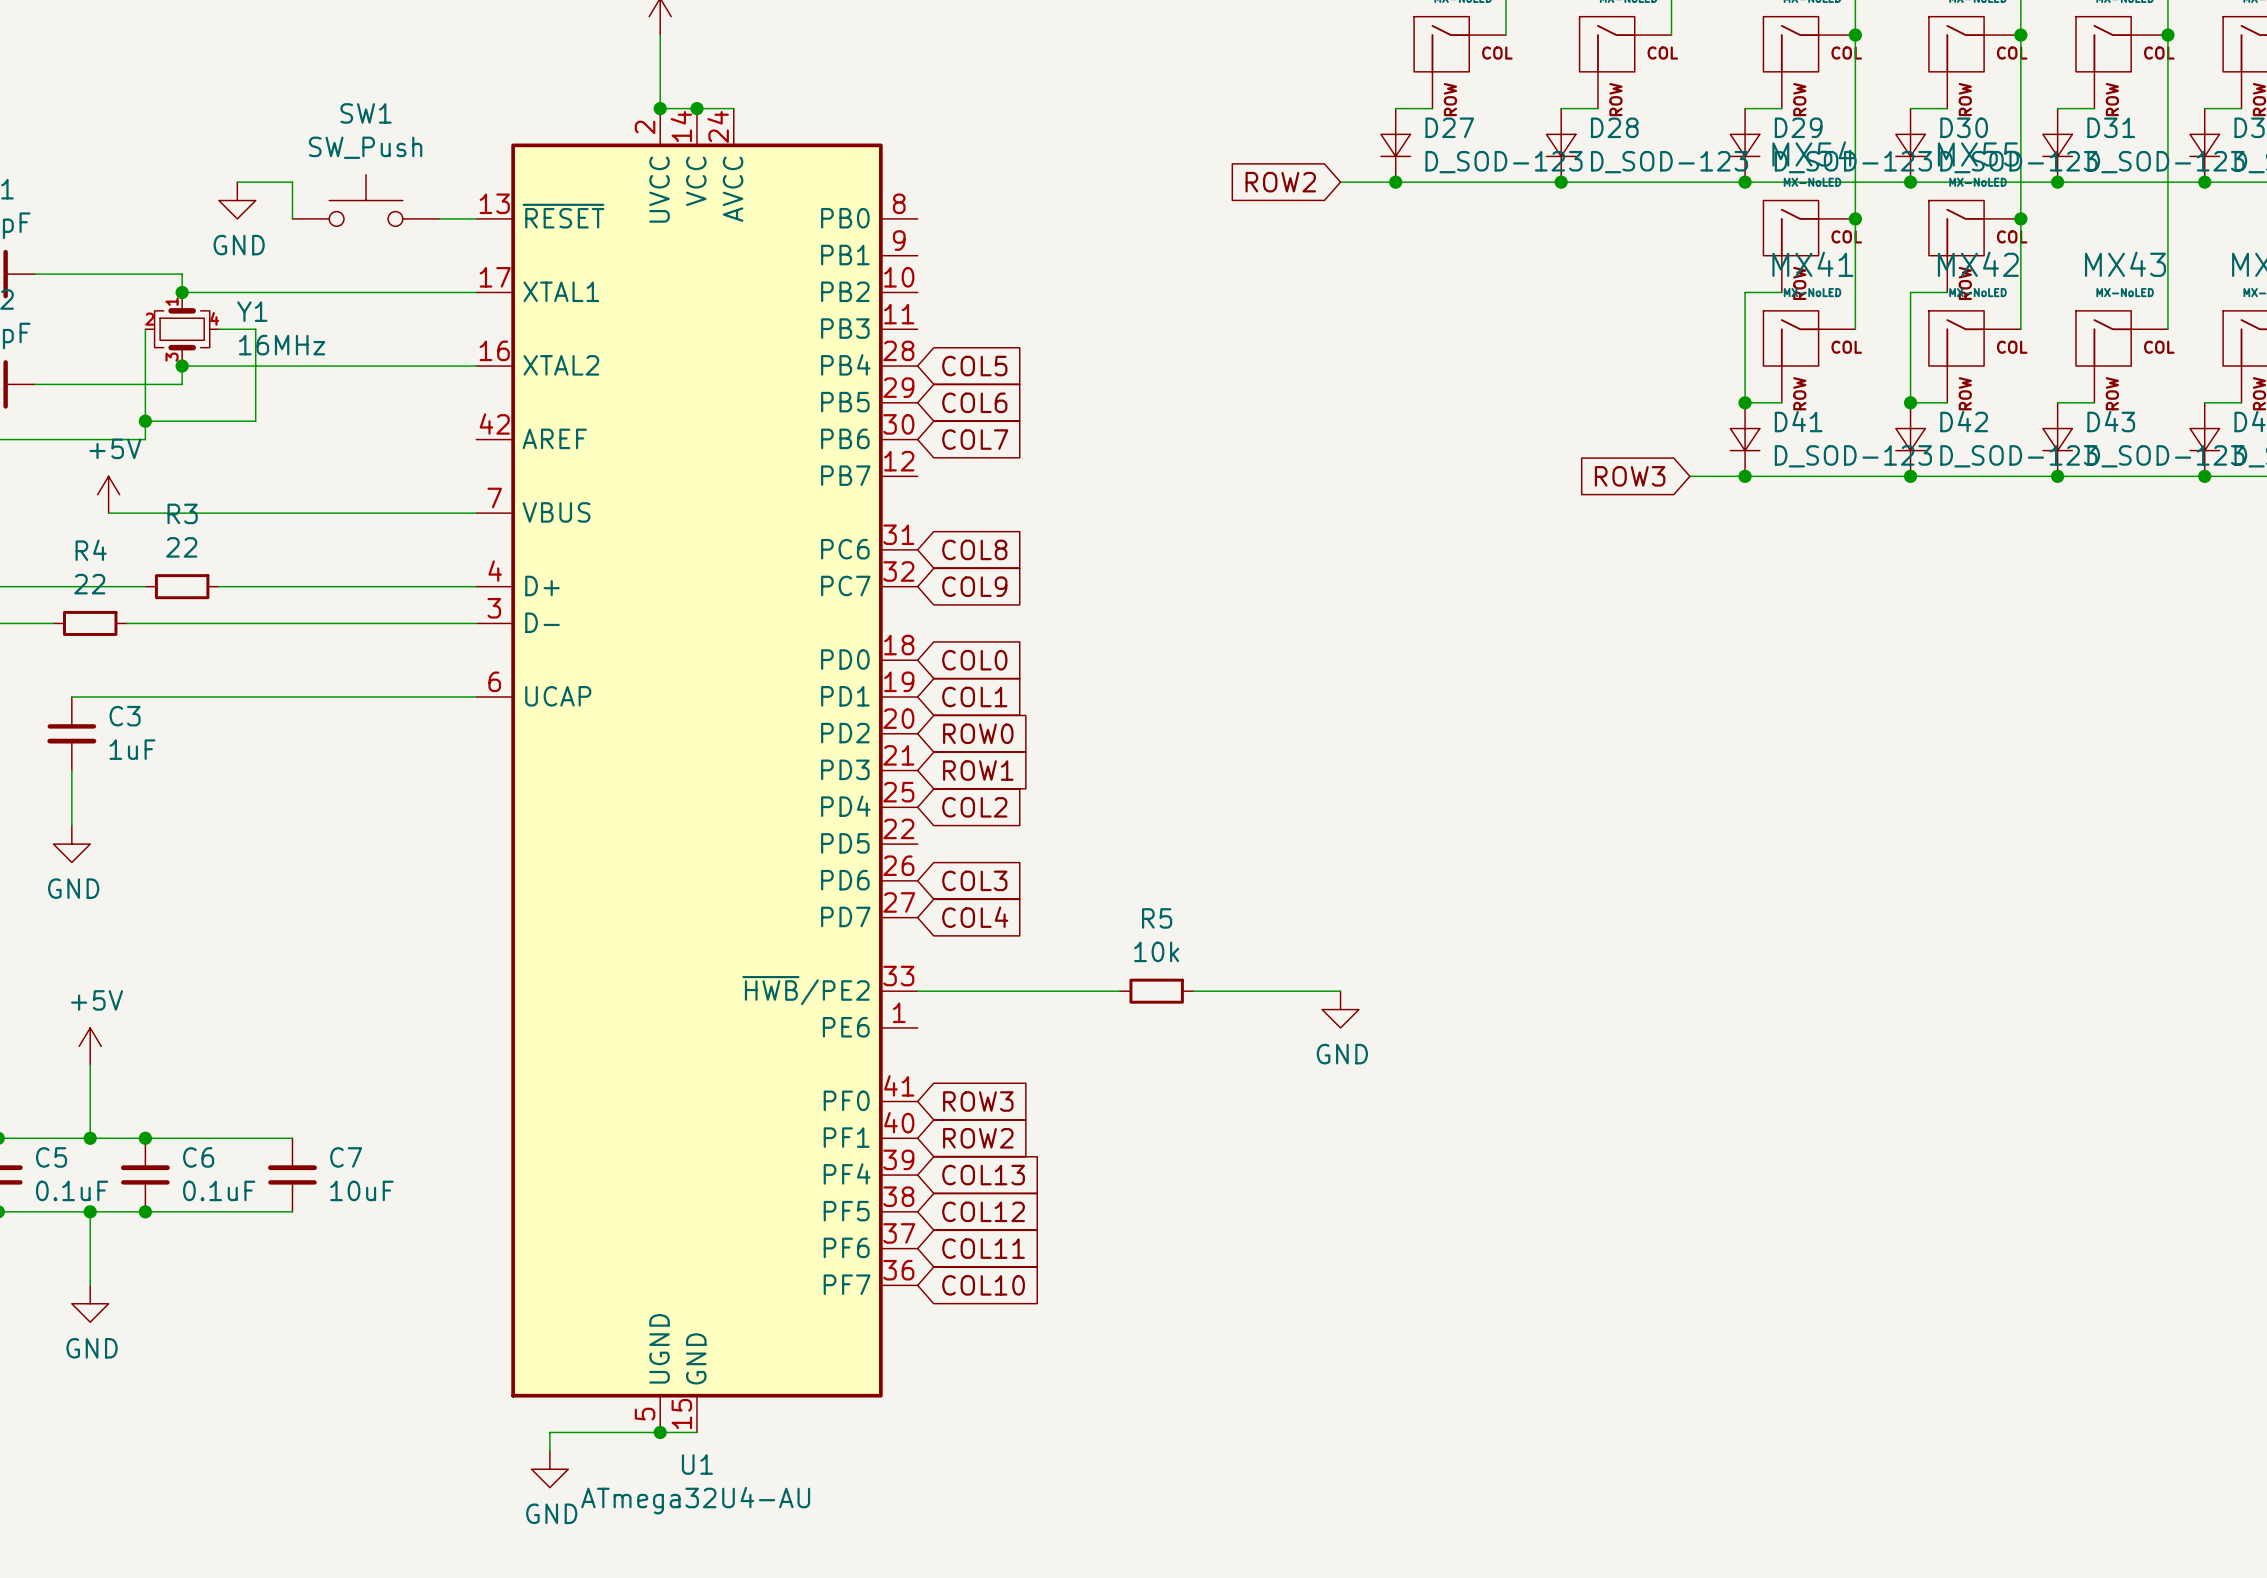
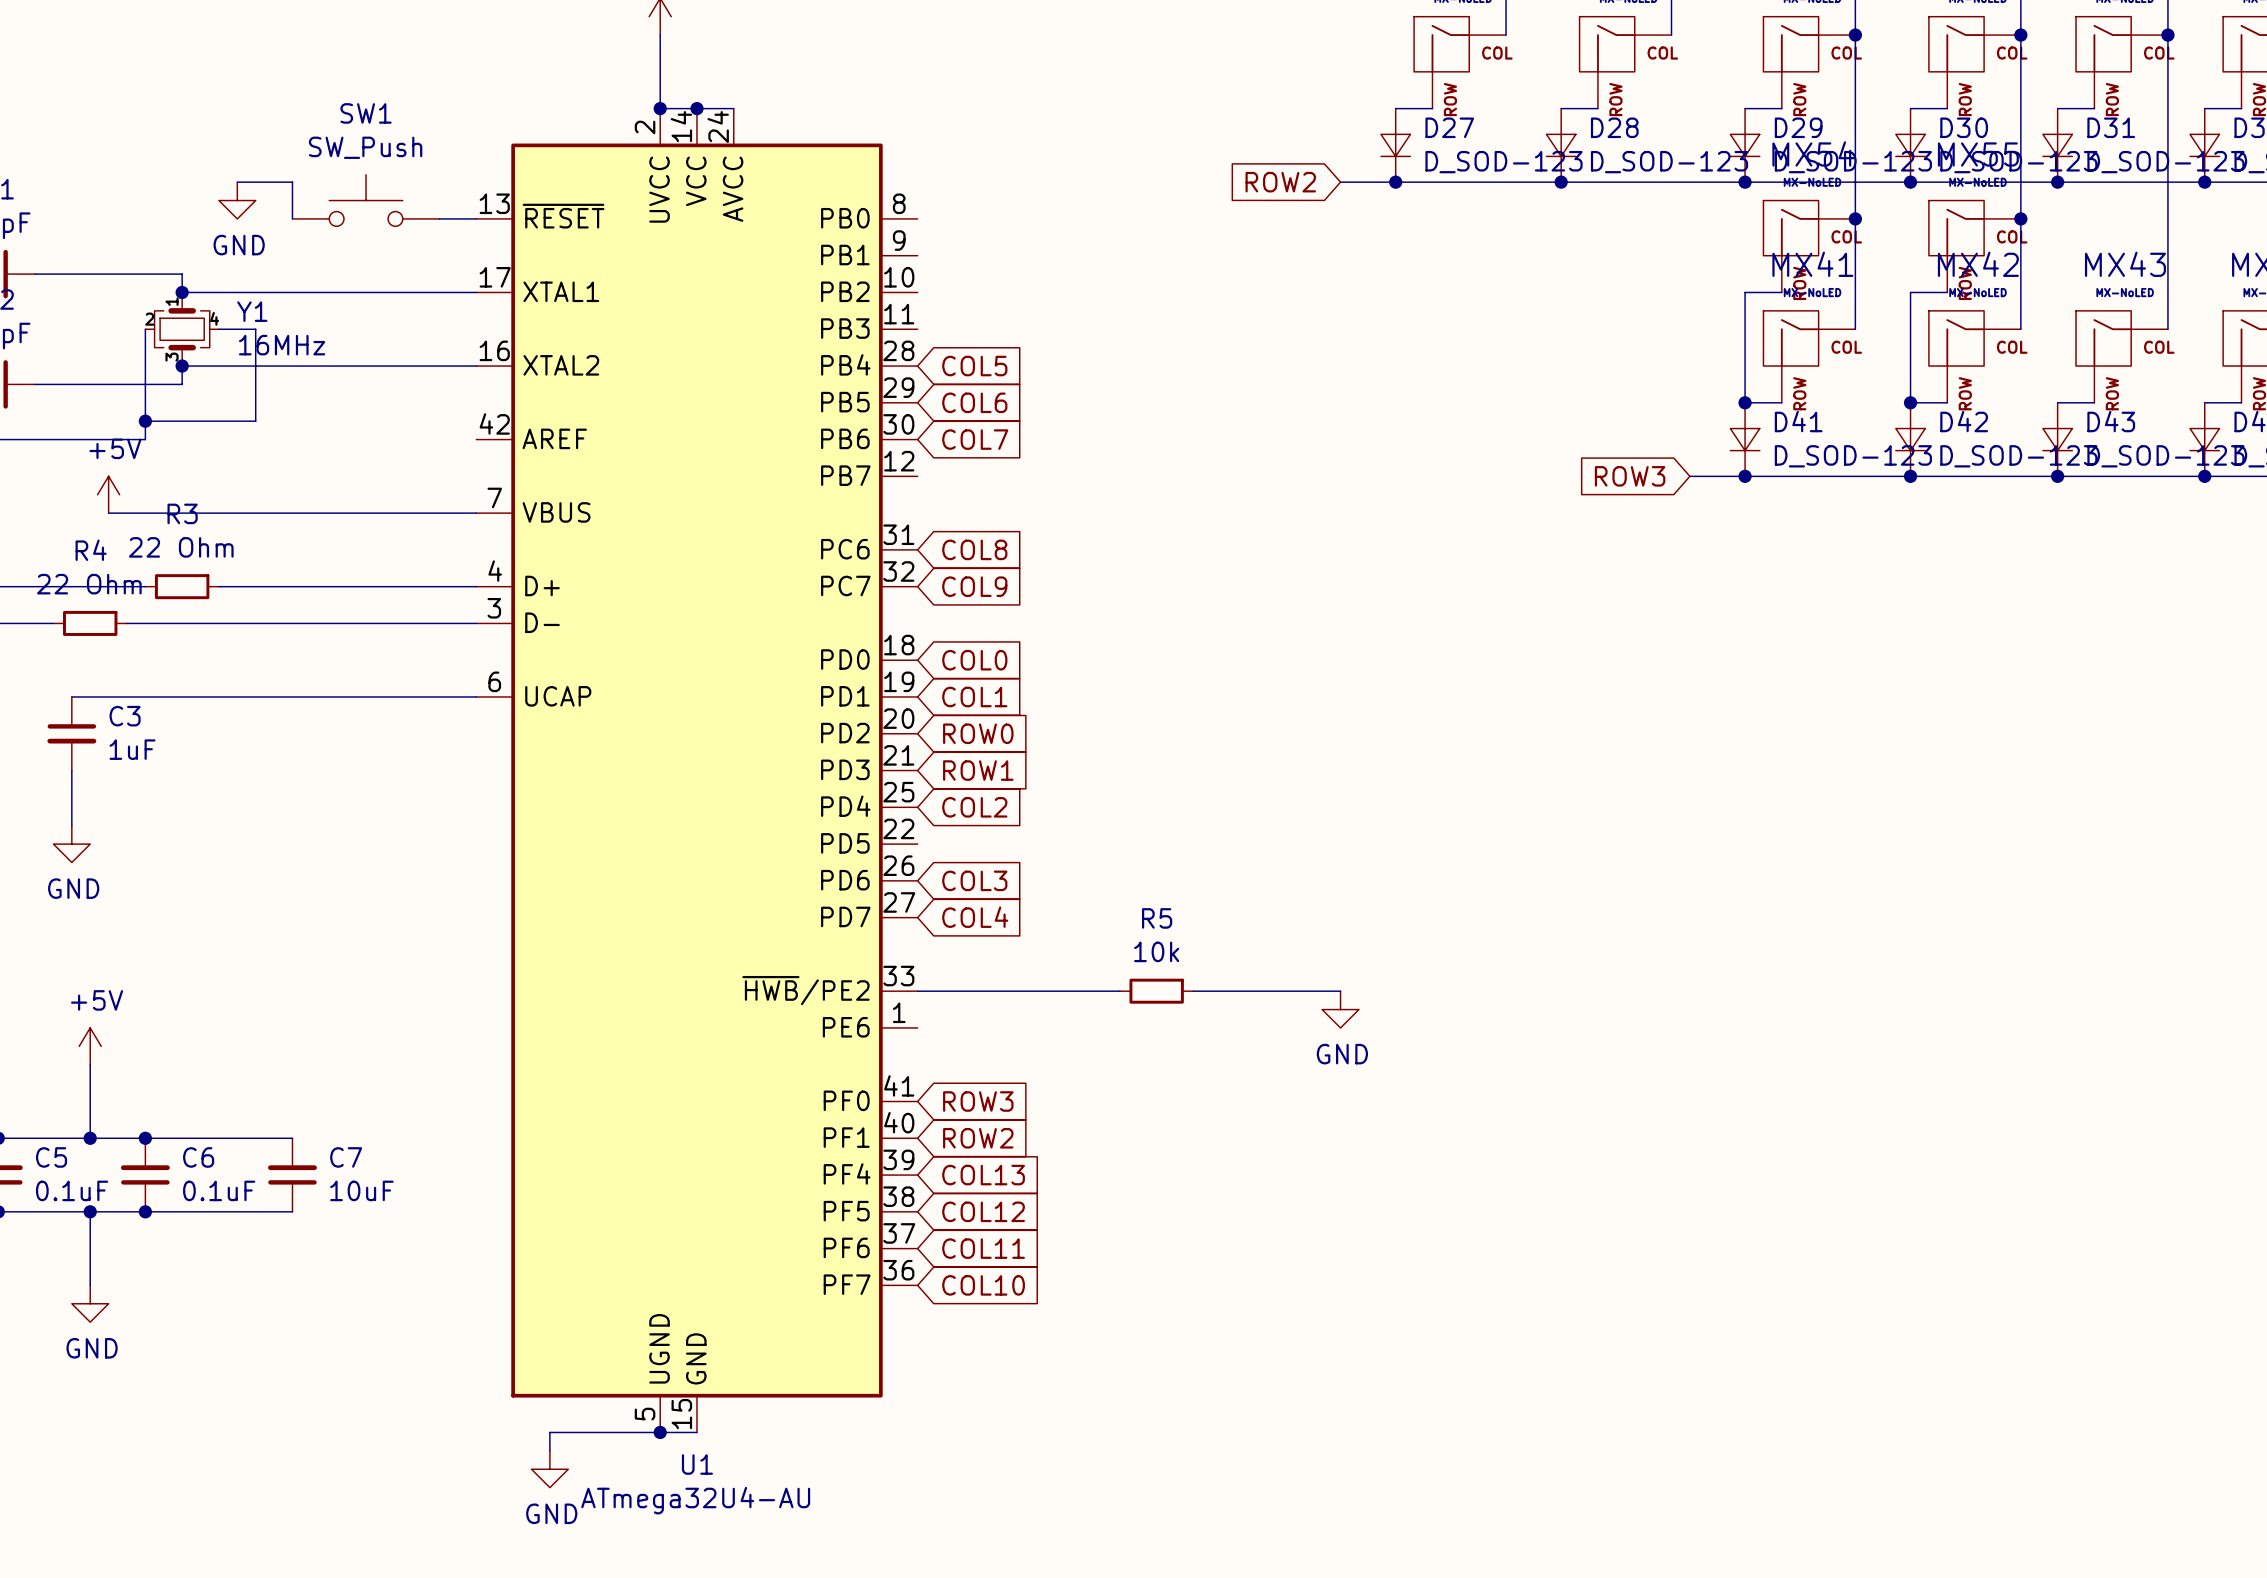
R3 value: 22 (181, 547) -> 22 Ohm (181, 547)
R4 value: 22 (89, 584) -> 22 Ohm (89, 584)

